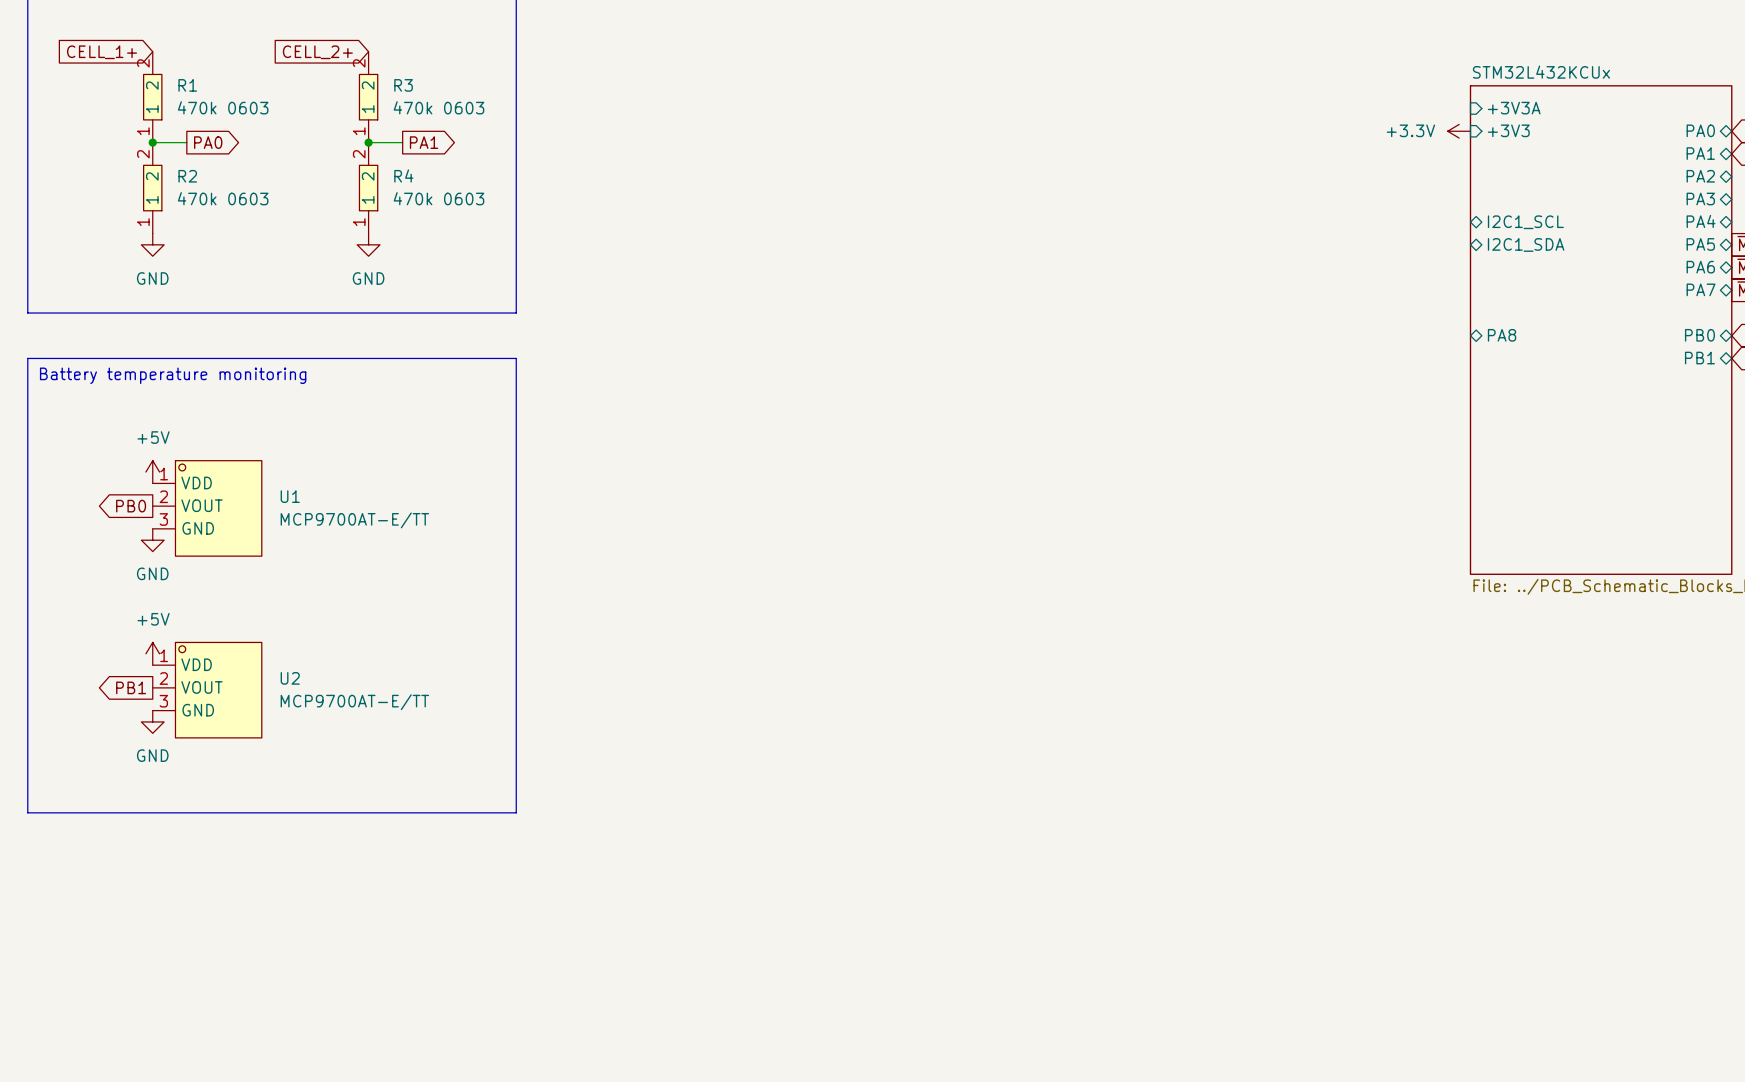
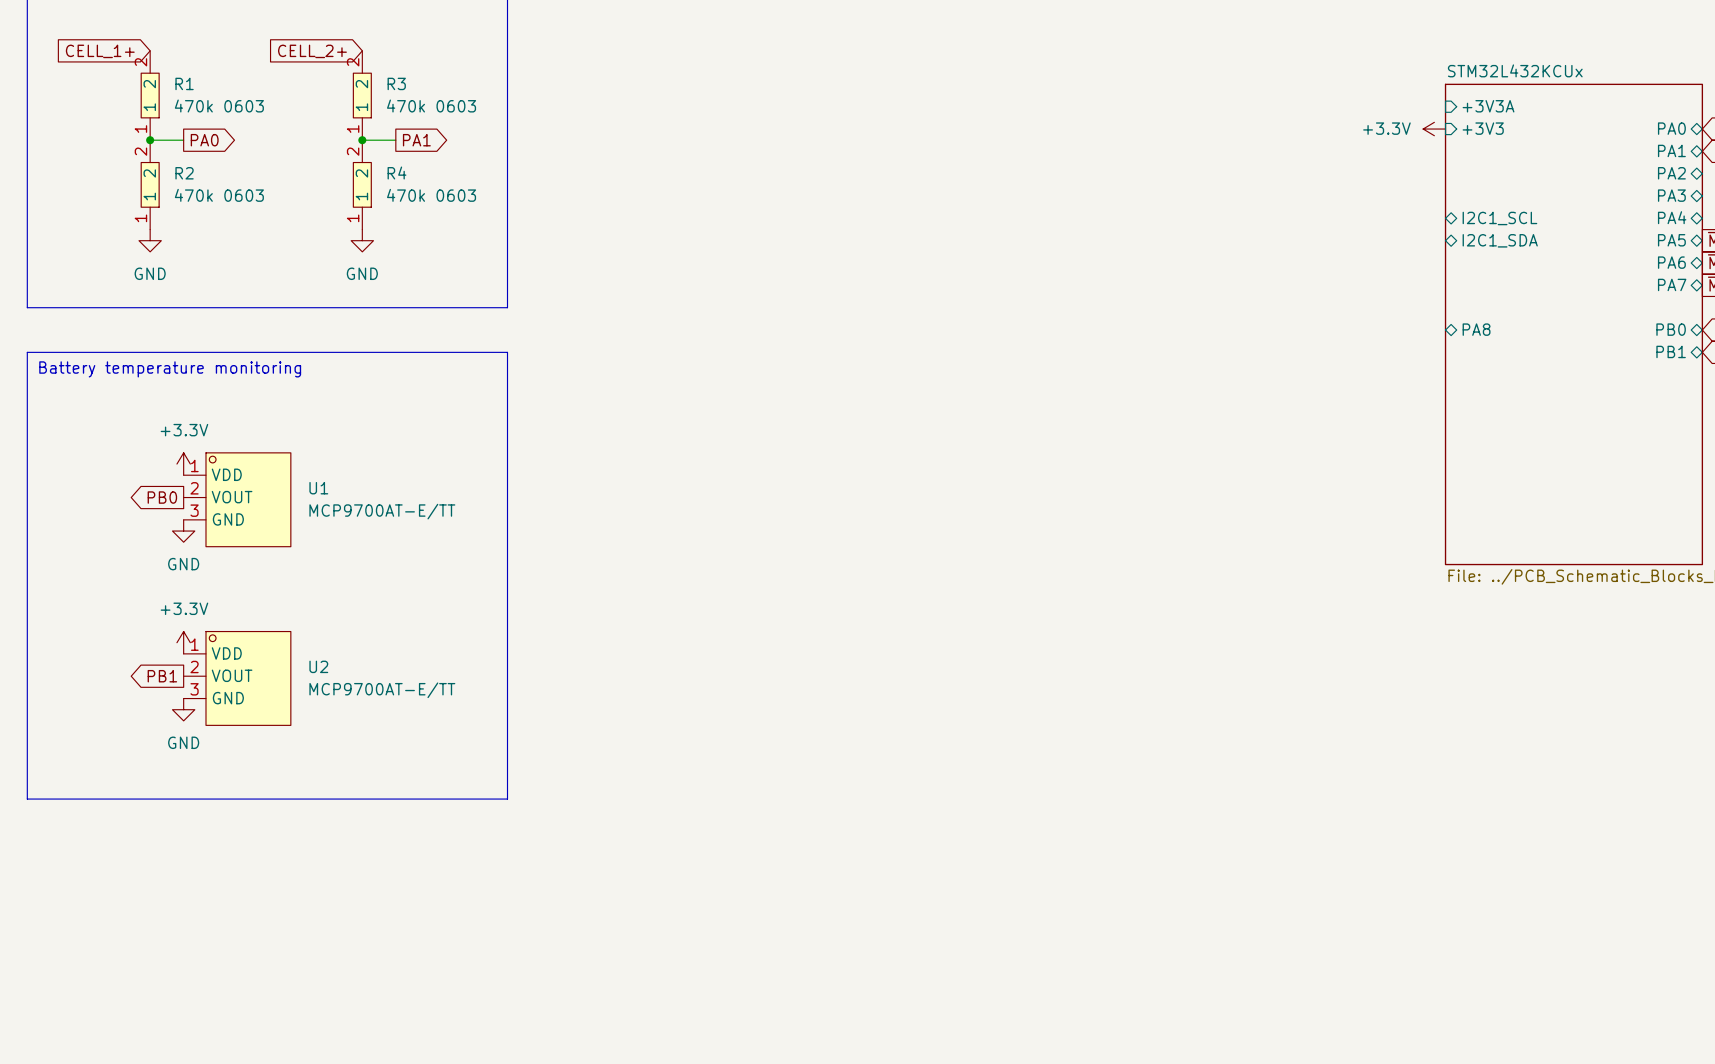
power symbol: +5V (152, 472) -> none
power symbol: none -> +3.3V (183, 464)
global label position: PB0 (131, 506) -> PB0 (162, 497)
U1 position: (207, 508) -> (237, 499)
power symbol position: GND (152, 540) -> GND (183, 531)
power symbol: +5V (152, 653) -> none
power symbol: none -> +3.3V (183, 642)
global label position: PB1 (131, 687) -> PB1 (162, 676)
U2 position: (207, 690) -> (237, 678)
power symbol position: GND (152, 721) -> GND (183, 709)

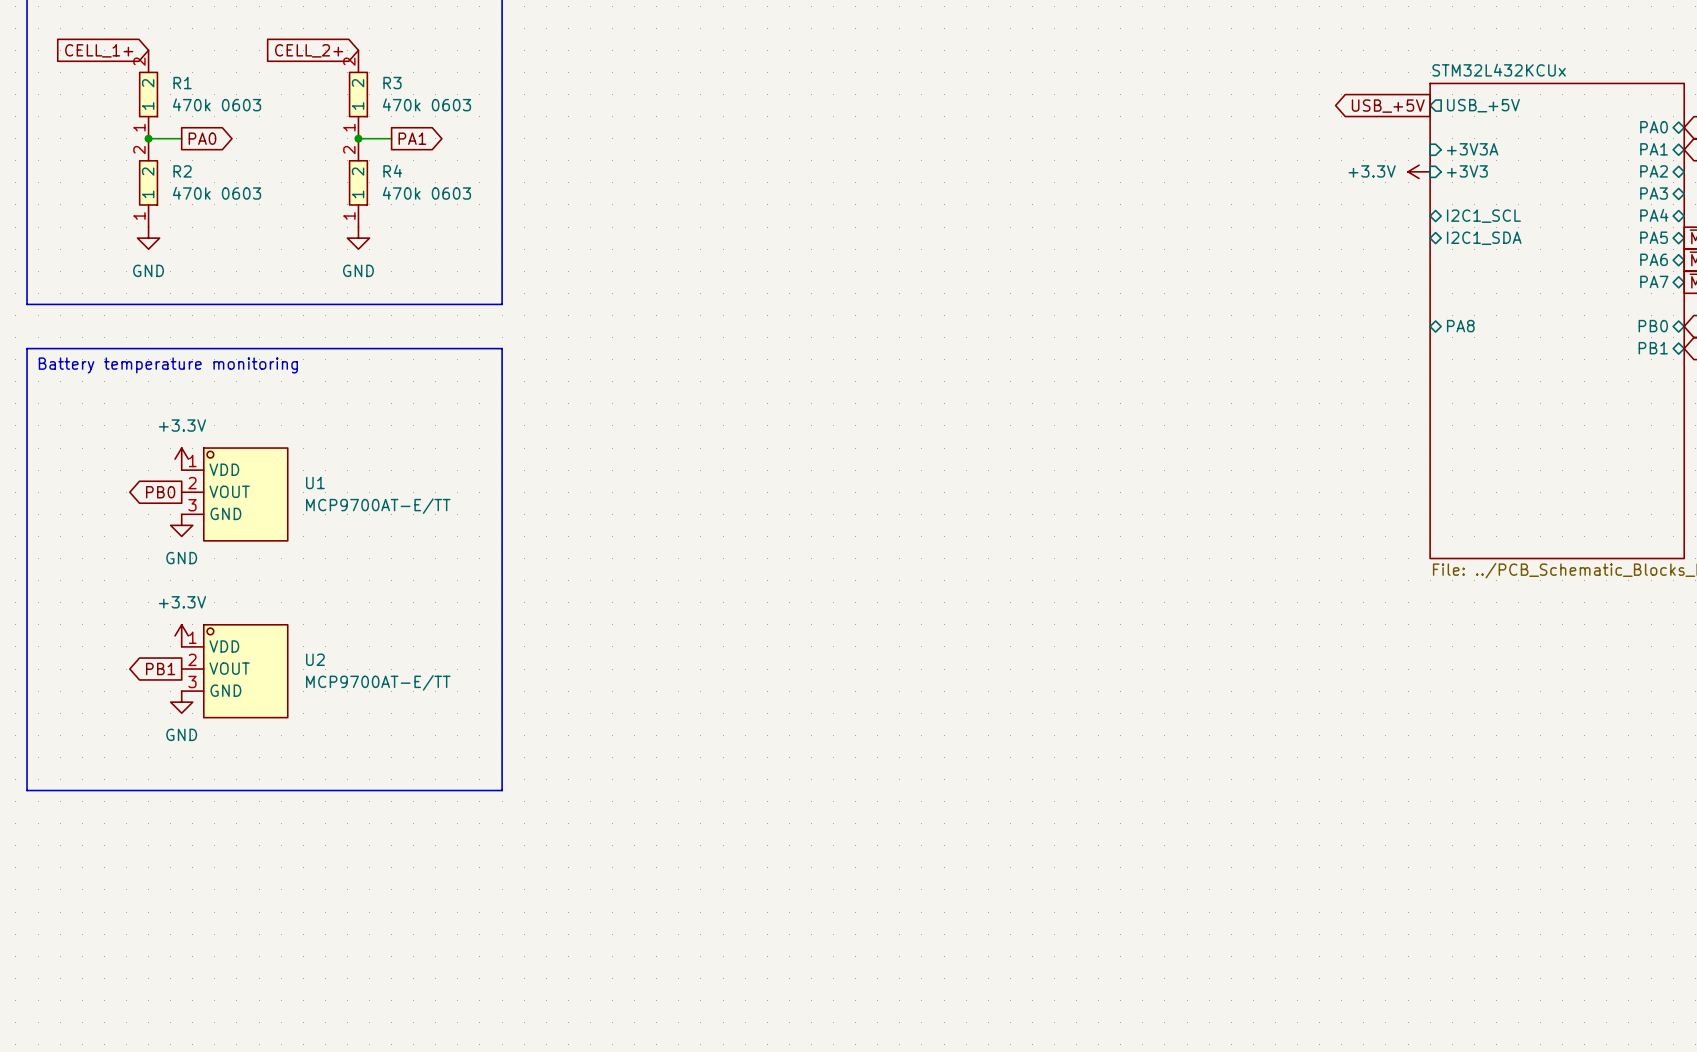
sheet pin shape: input (1488, 106) -> output (1483, 105)
sheet pin: +3V3A (1488, 106) -> USB_+5V (1483, 105)
global label: none -> USB_+5V (1388, 106)
sheet pin position: +3V3 (1483, 128) -> +3V3 (1467, 171)
power symbol position: +3.3V (1434, 129) -> +3.3V (1419, 171)
sheet pin: none -> +3V3A (1472, 149)

